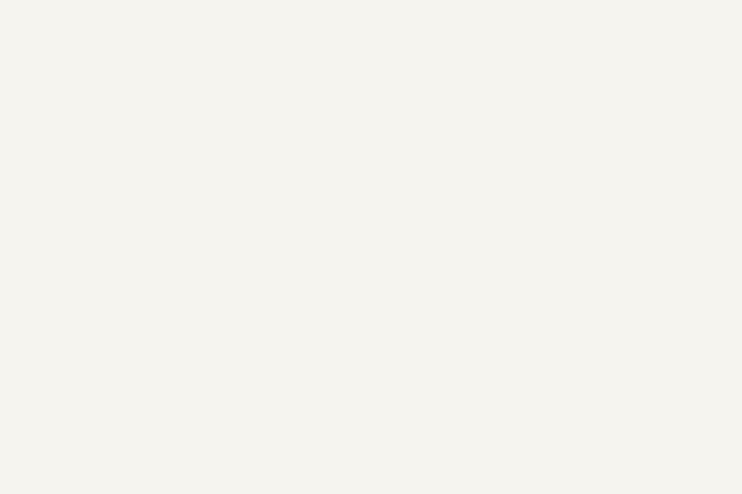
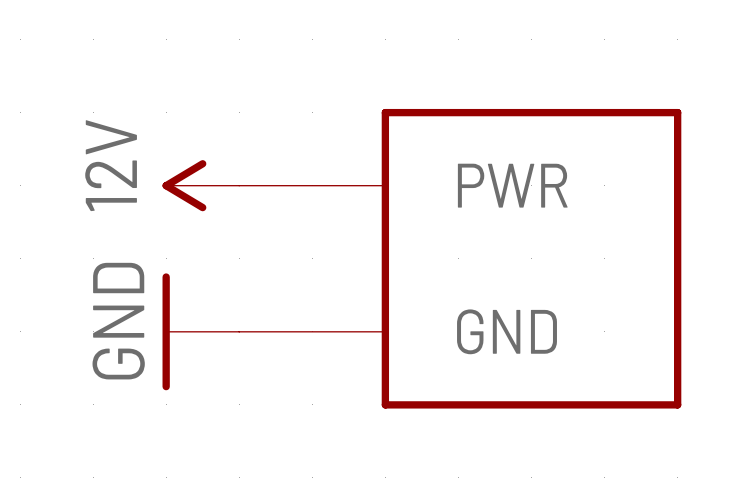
power symbol: none -> 12V (200, 185)
part: none -> (460, 258)
power symbol: none -> GND (200, 331)

